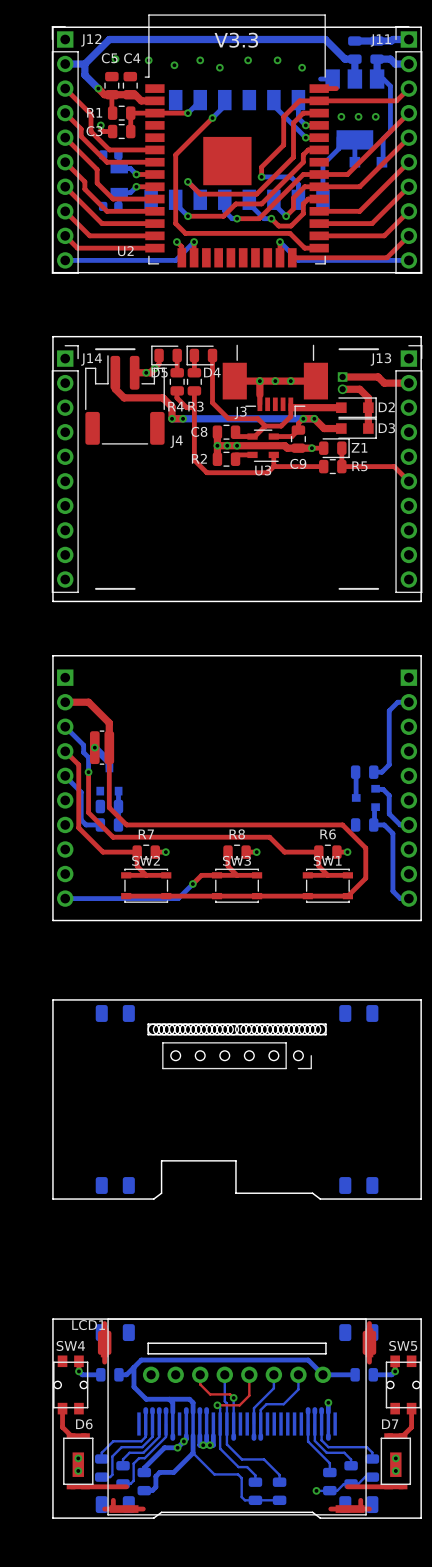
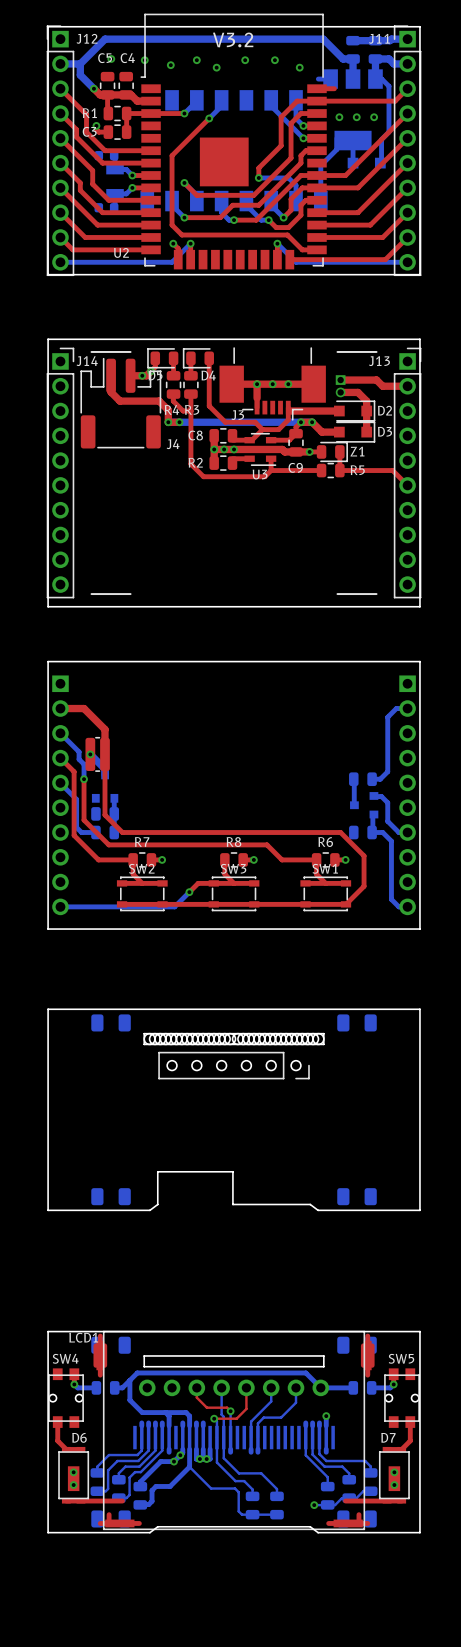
text: V3.3 (236, 40) -> V3.2 (233, 39)

